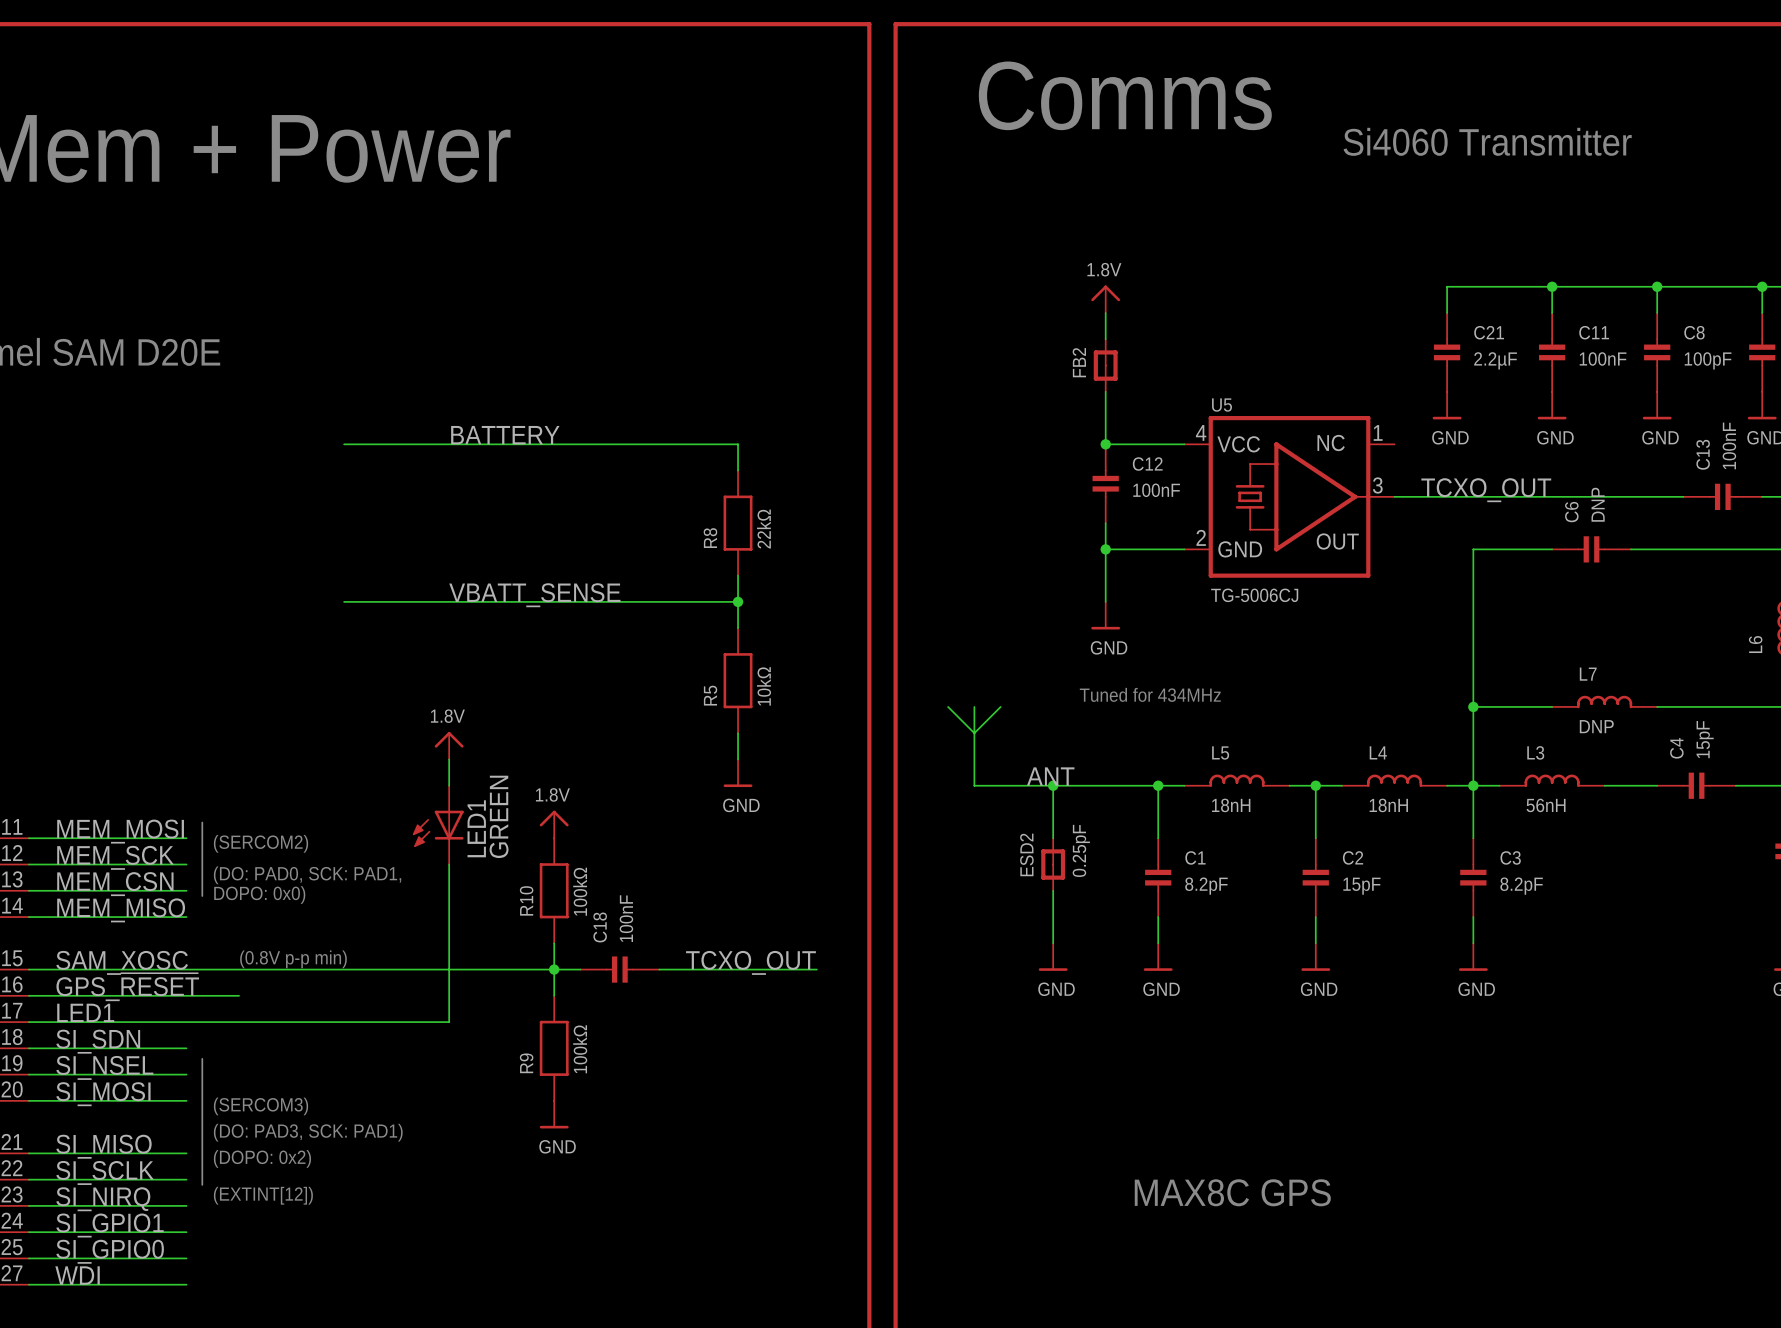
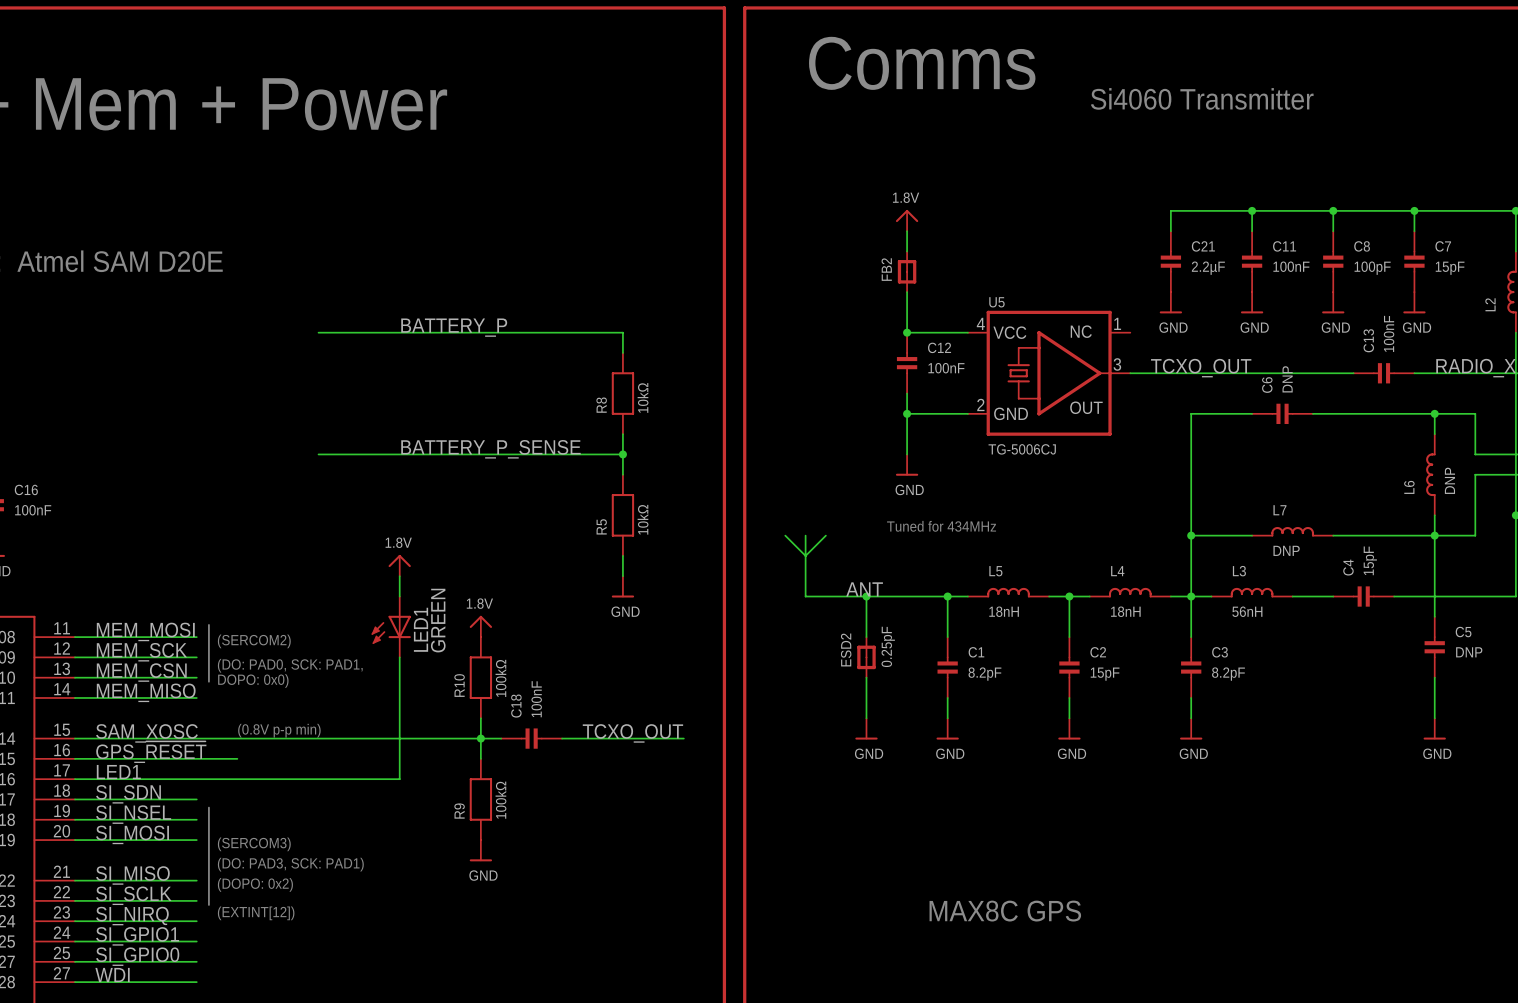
label: BATTERY (505, 435) -> BATTERY_P (454, 327)
R8 value: 22kΩ (763, 529) -> 10kΩ (643, 397)
label: VBATT_SENSE (534, 595) -> BATTERY_P_SENSE (490, 449)

